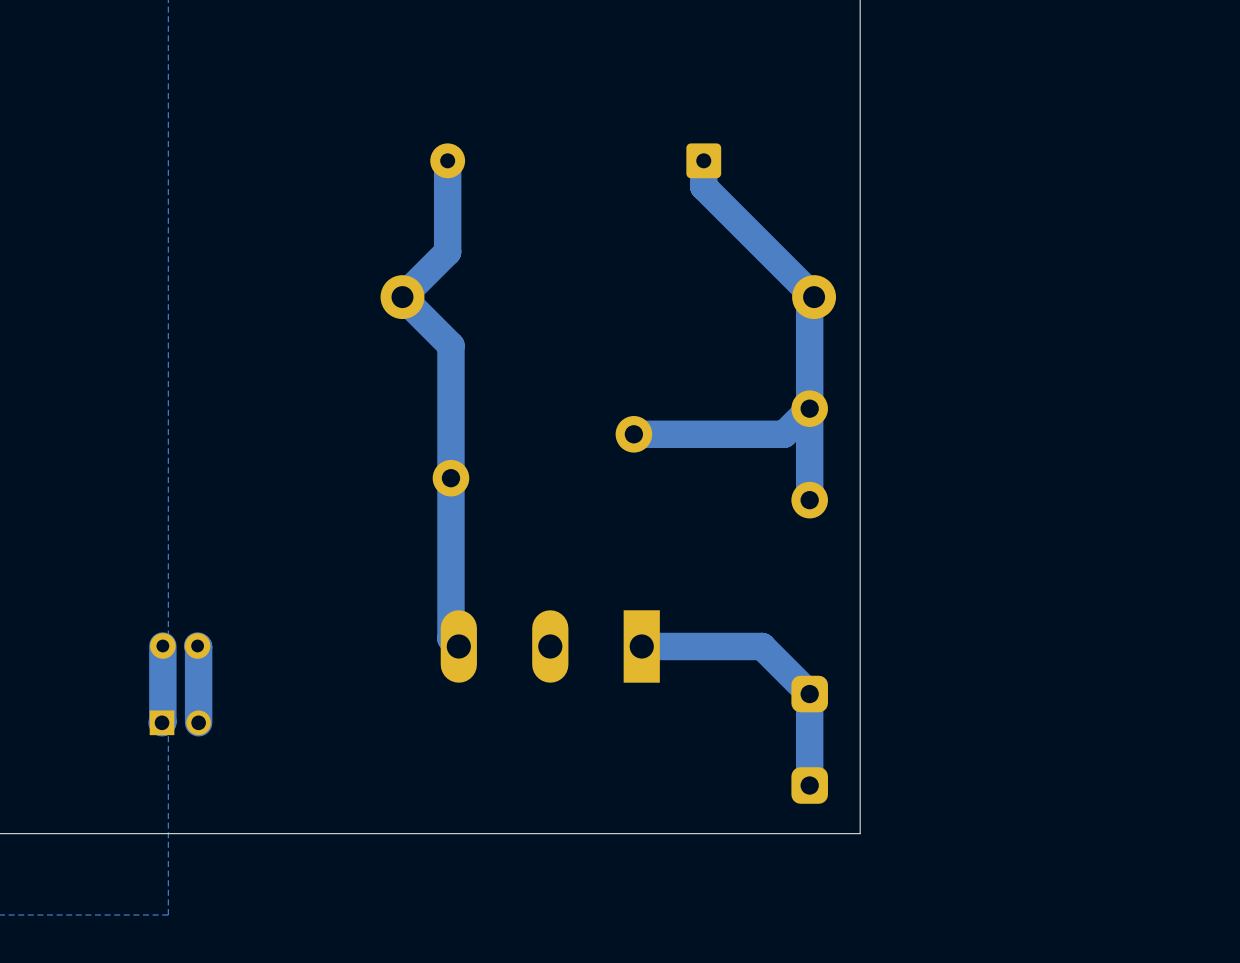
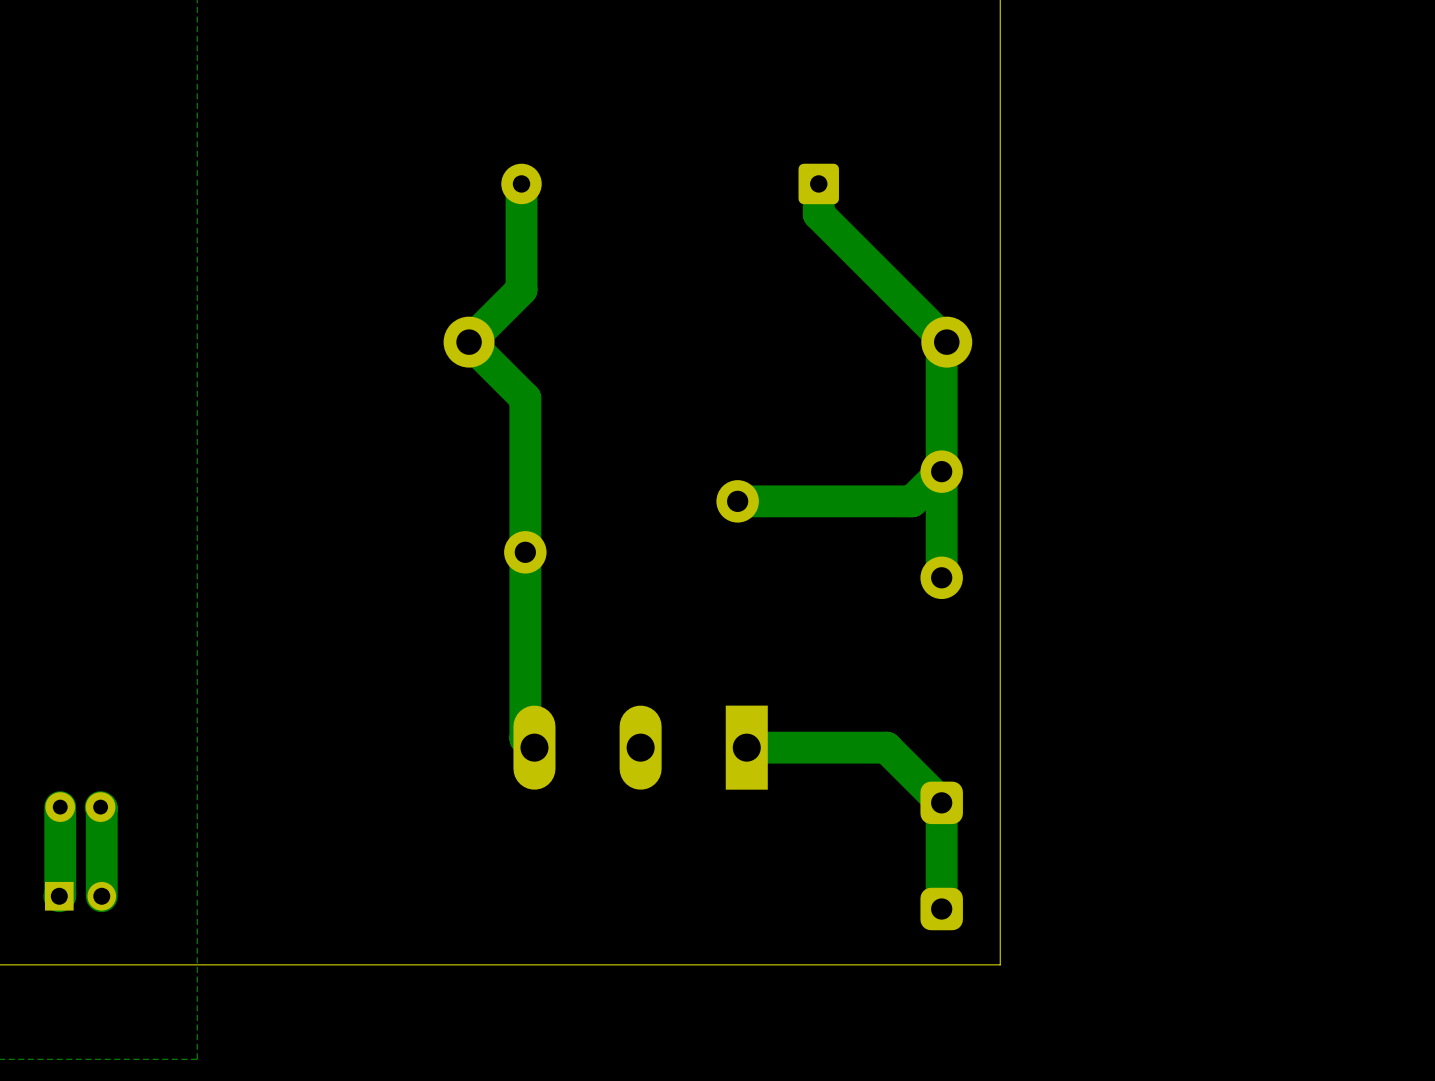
bottom track: (162, 645) (162, 722) -> (60, 807) (59, 896)
part position: (180, 645) -> (80, 807)
bottom track: (197, 645) (198, 722) -> (100, 807) (101, 896)
part position: (180, 722) -> (80, 896)

